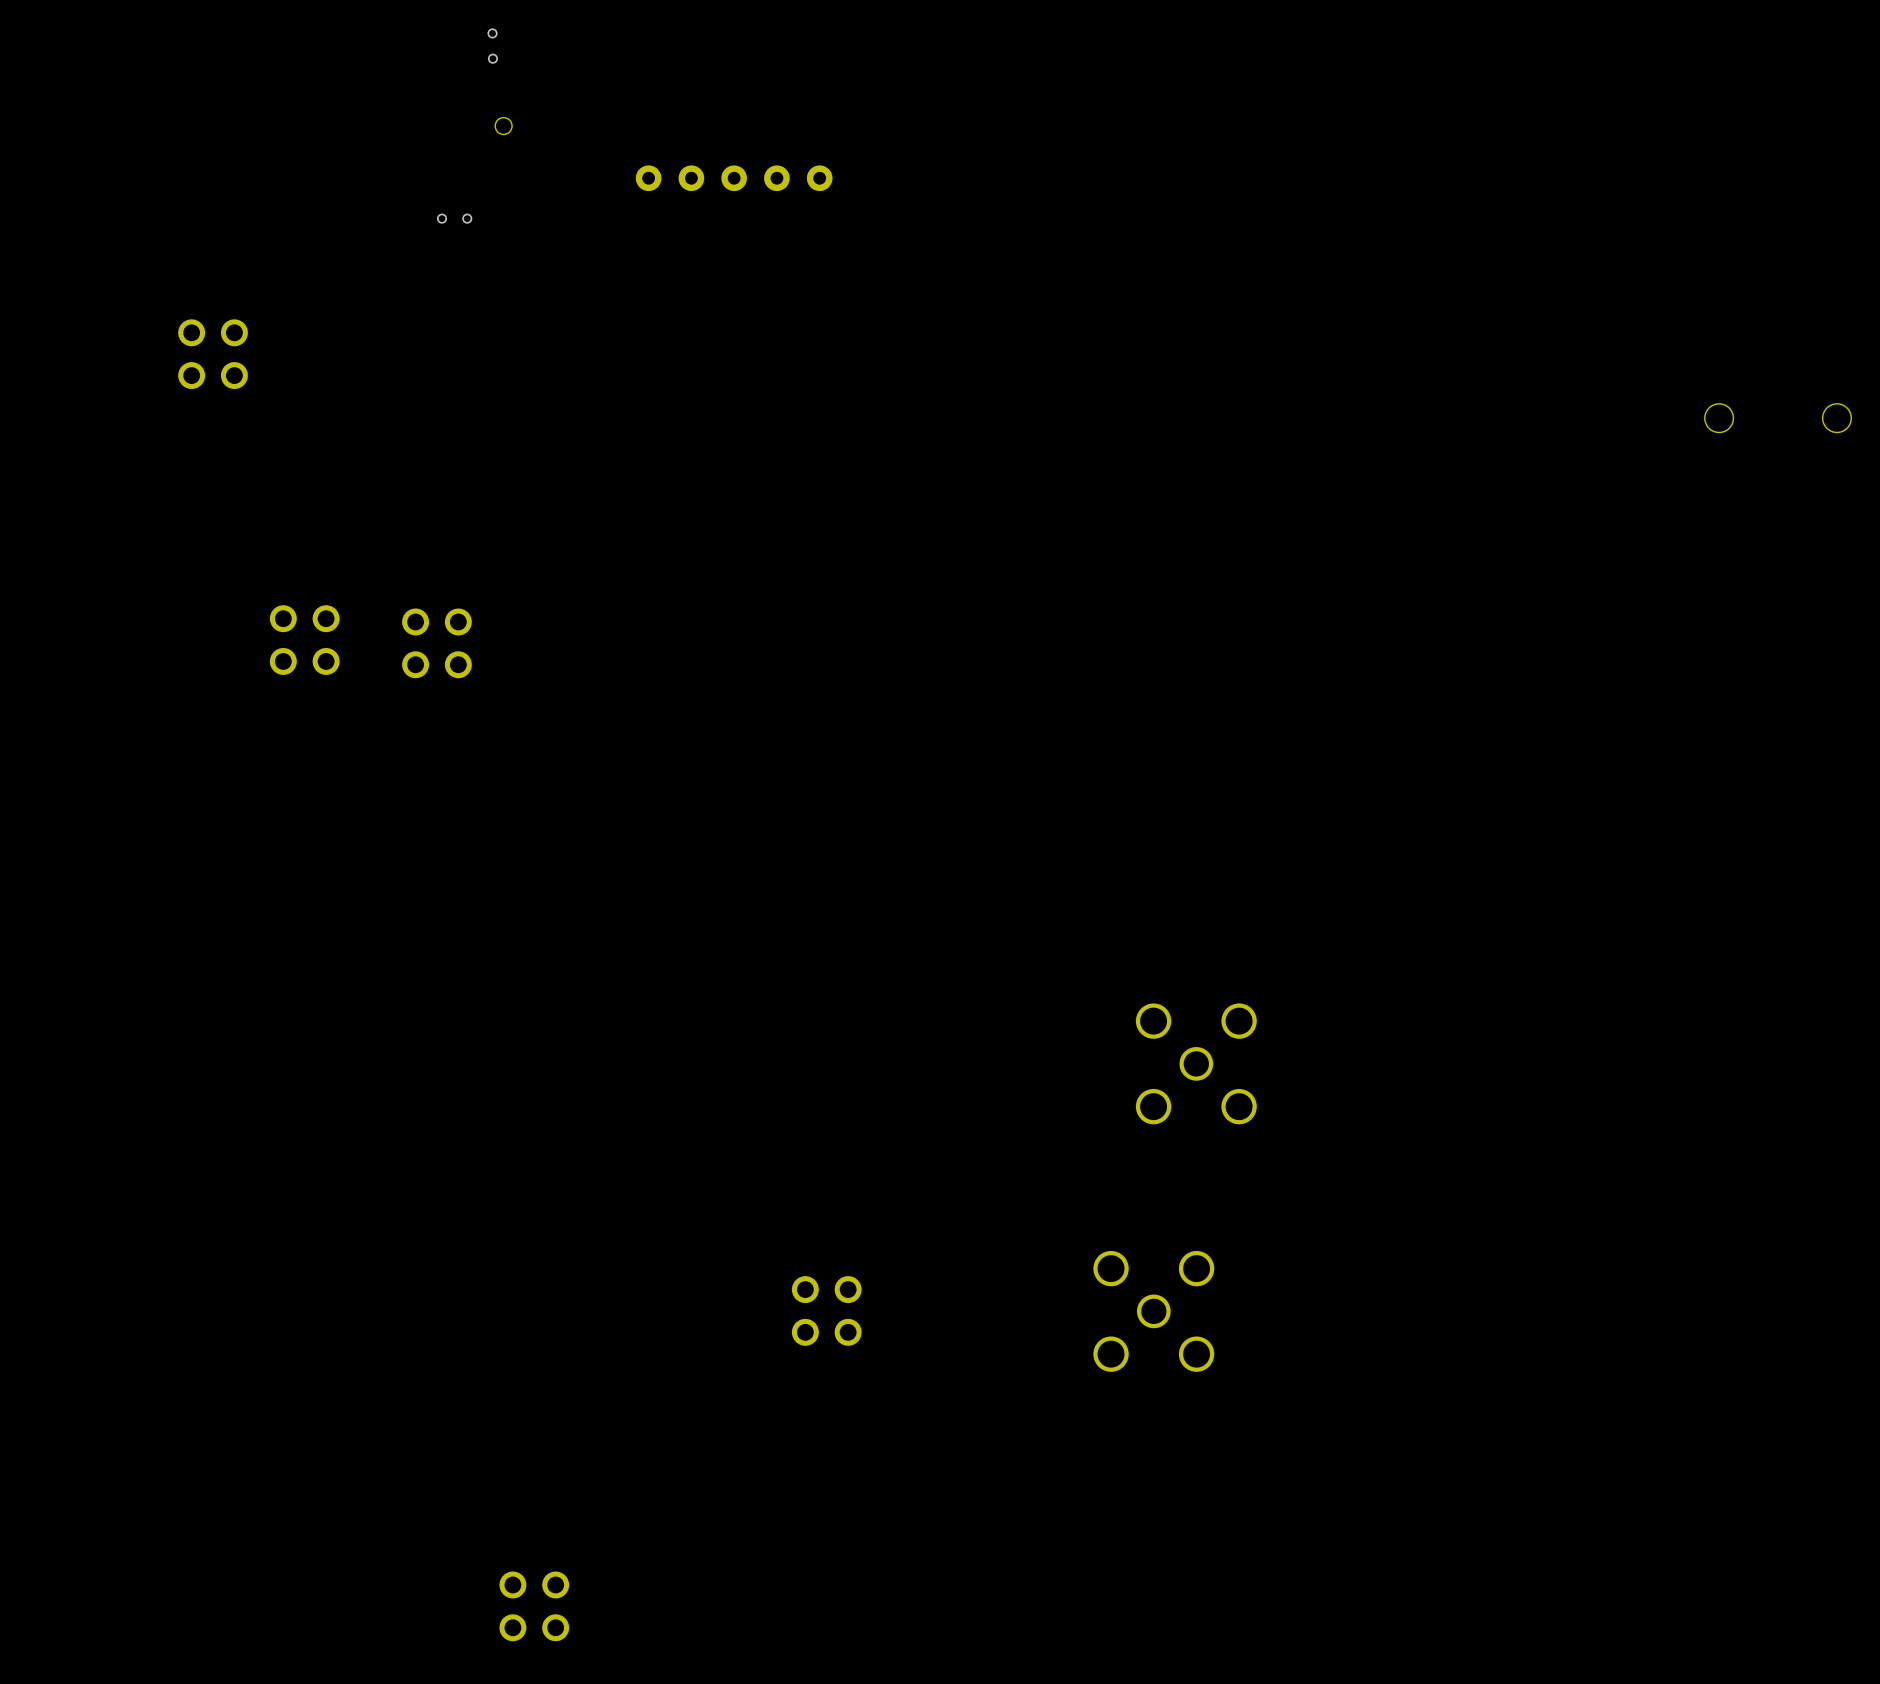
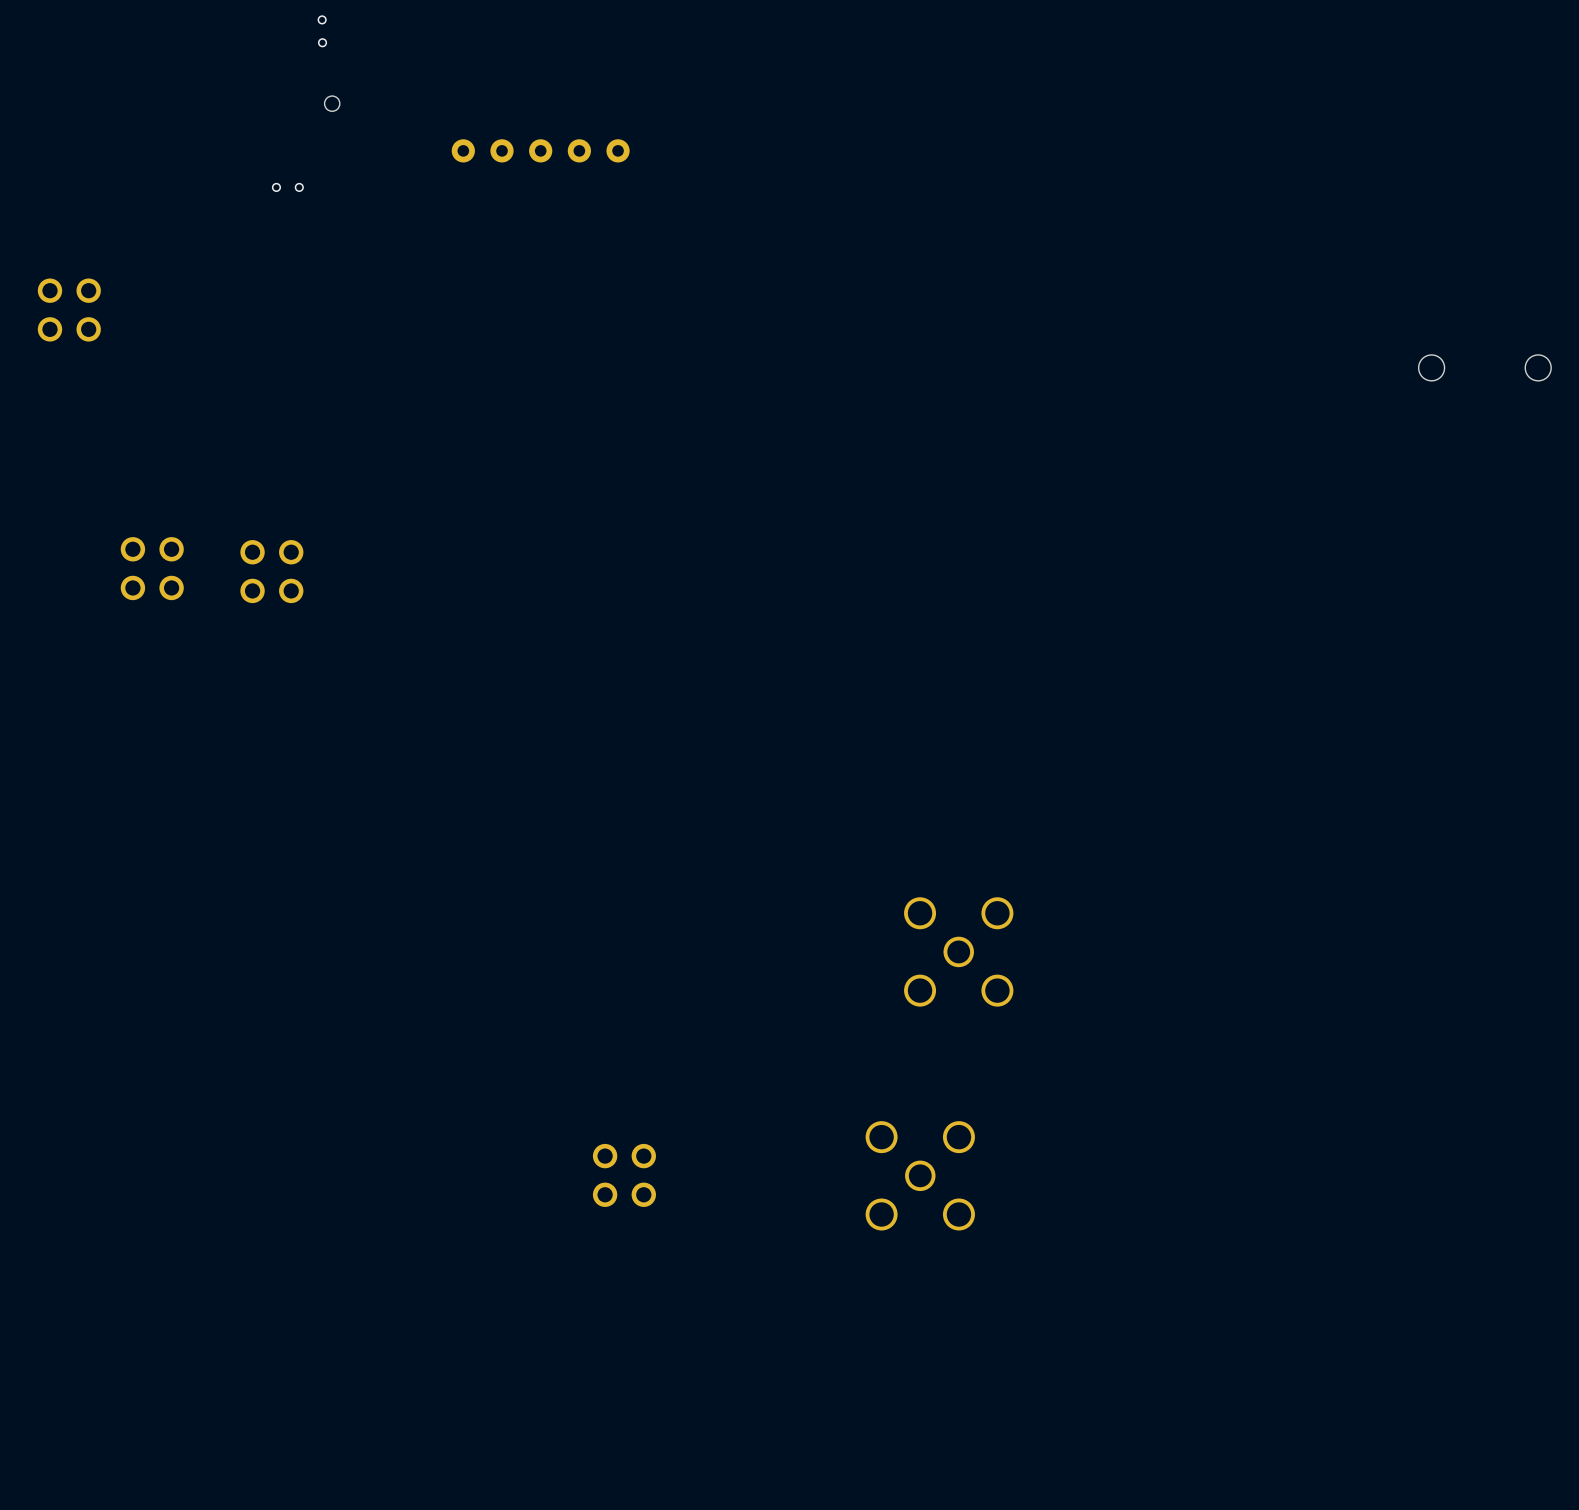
part: (534, 1606) -> none

